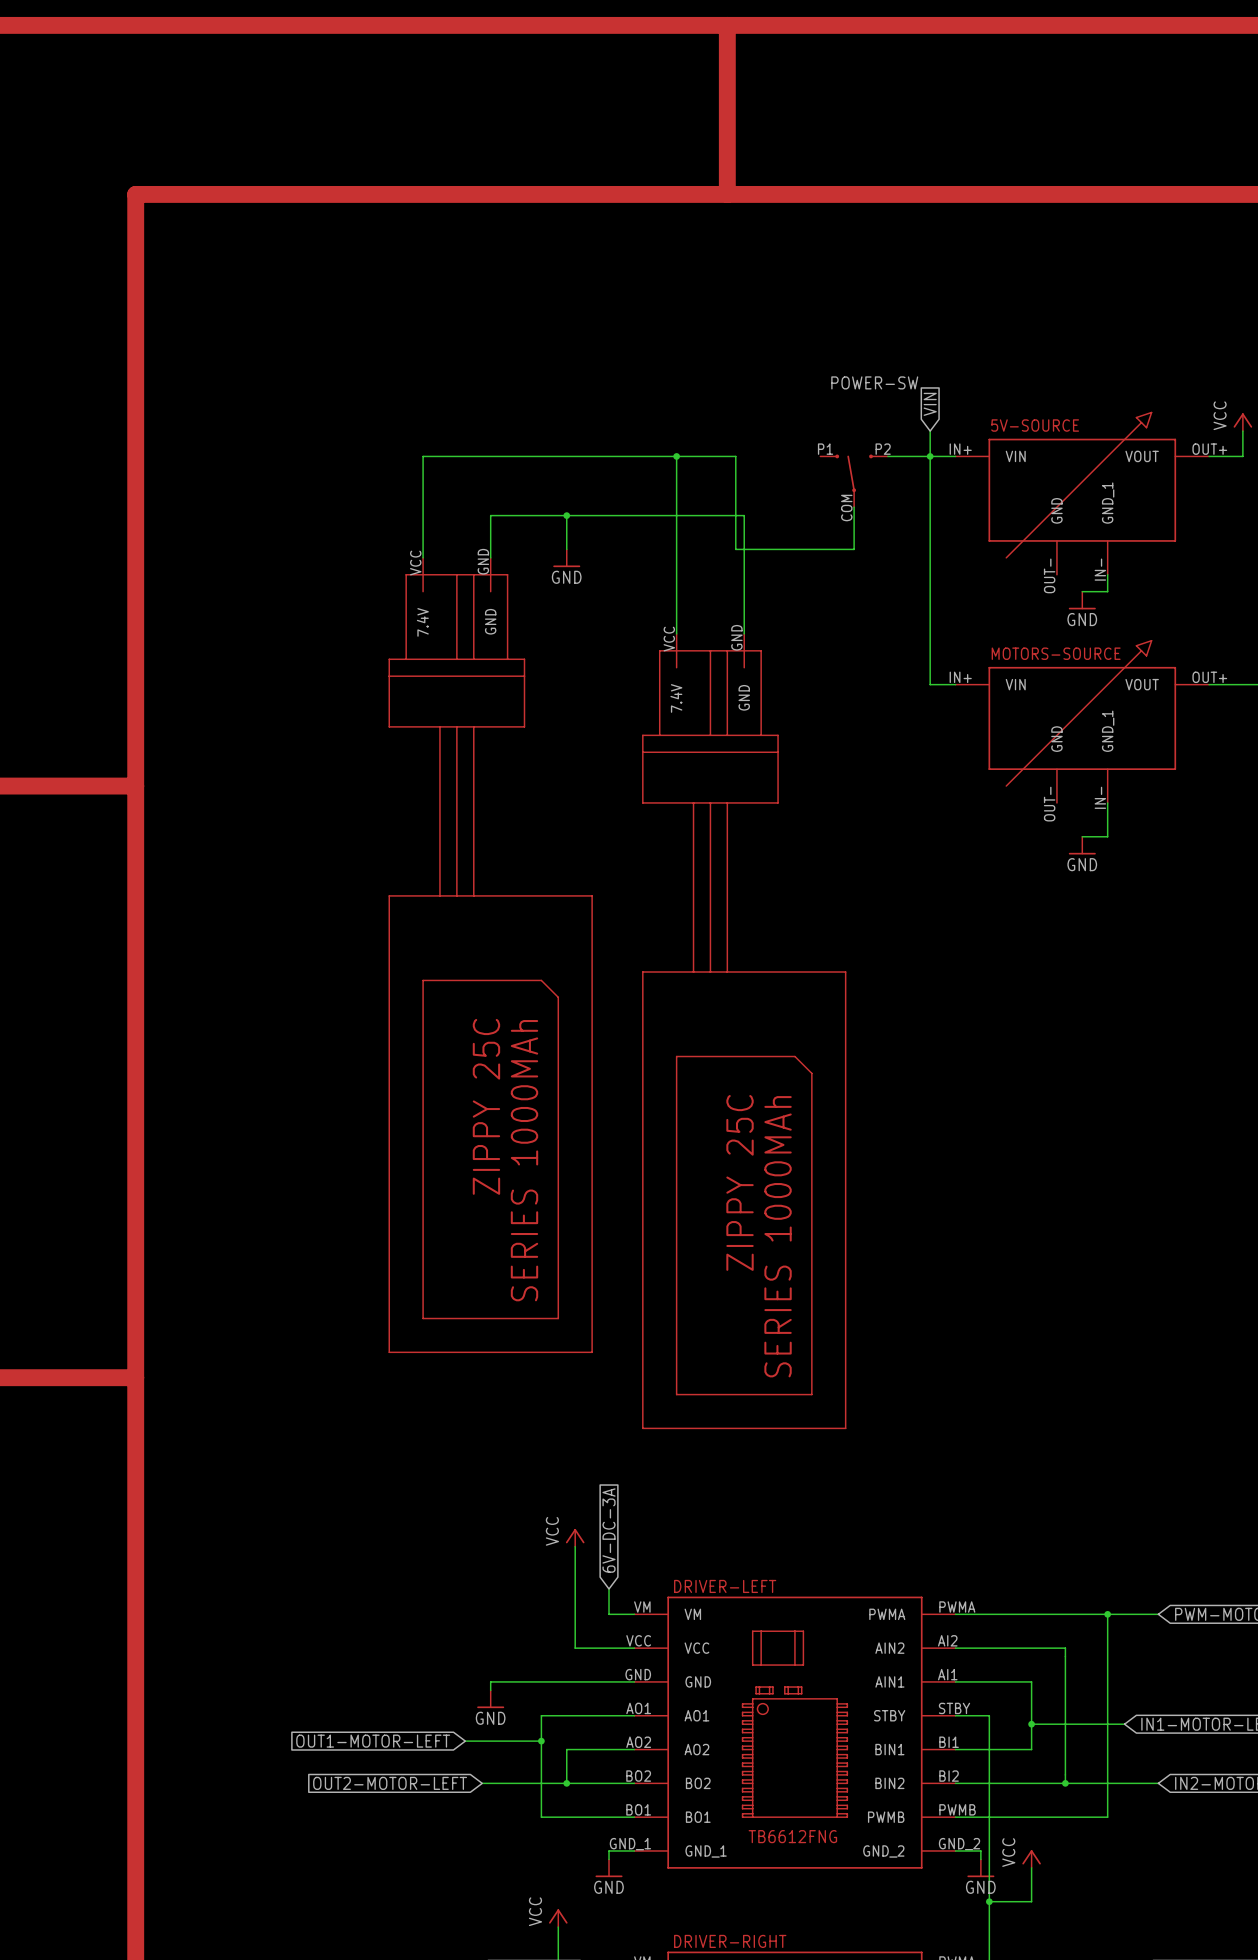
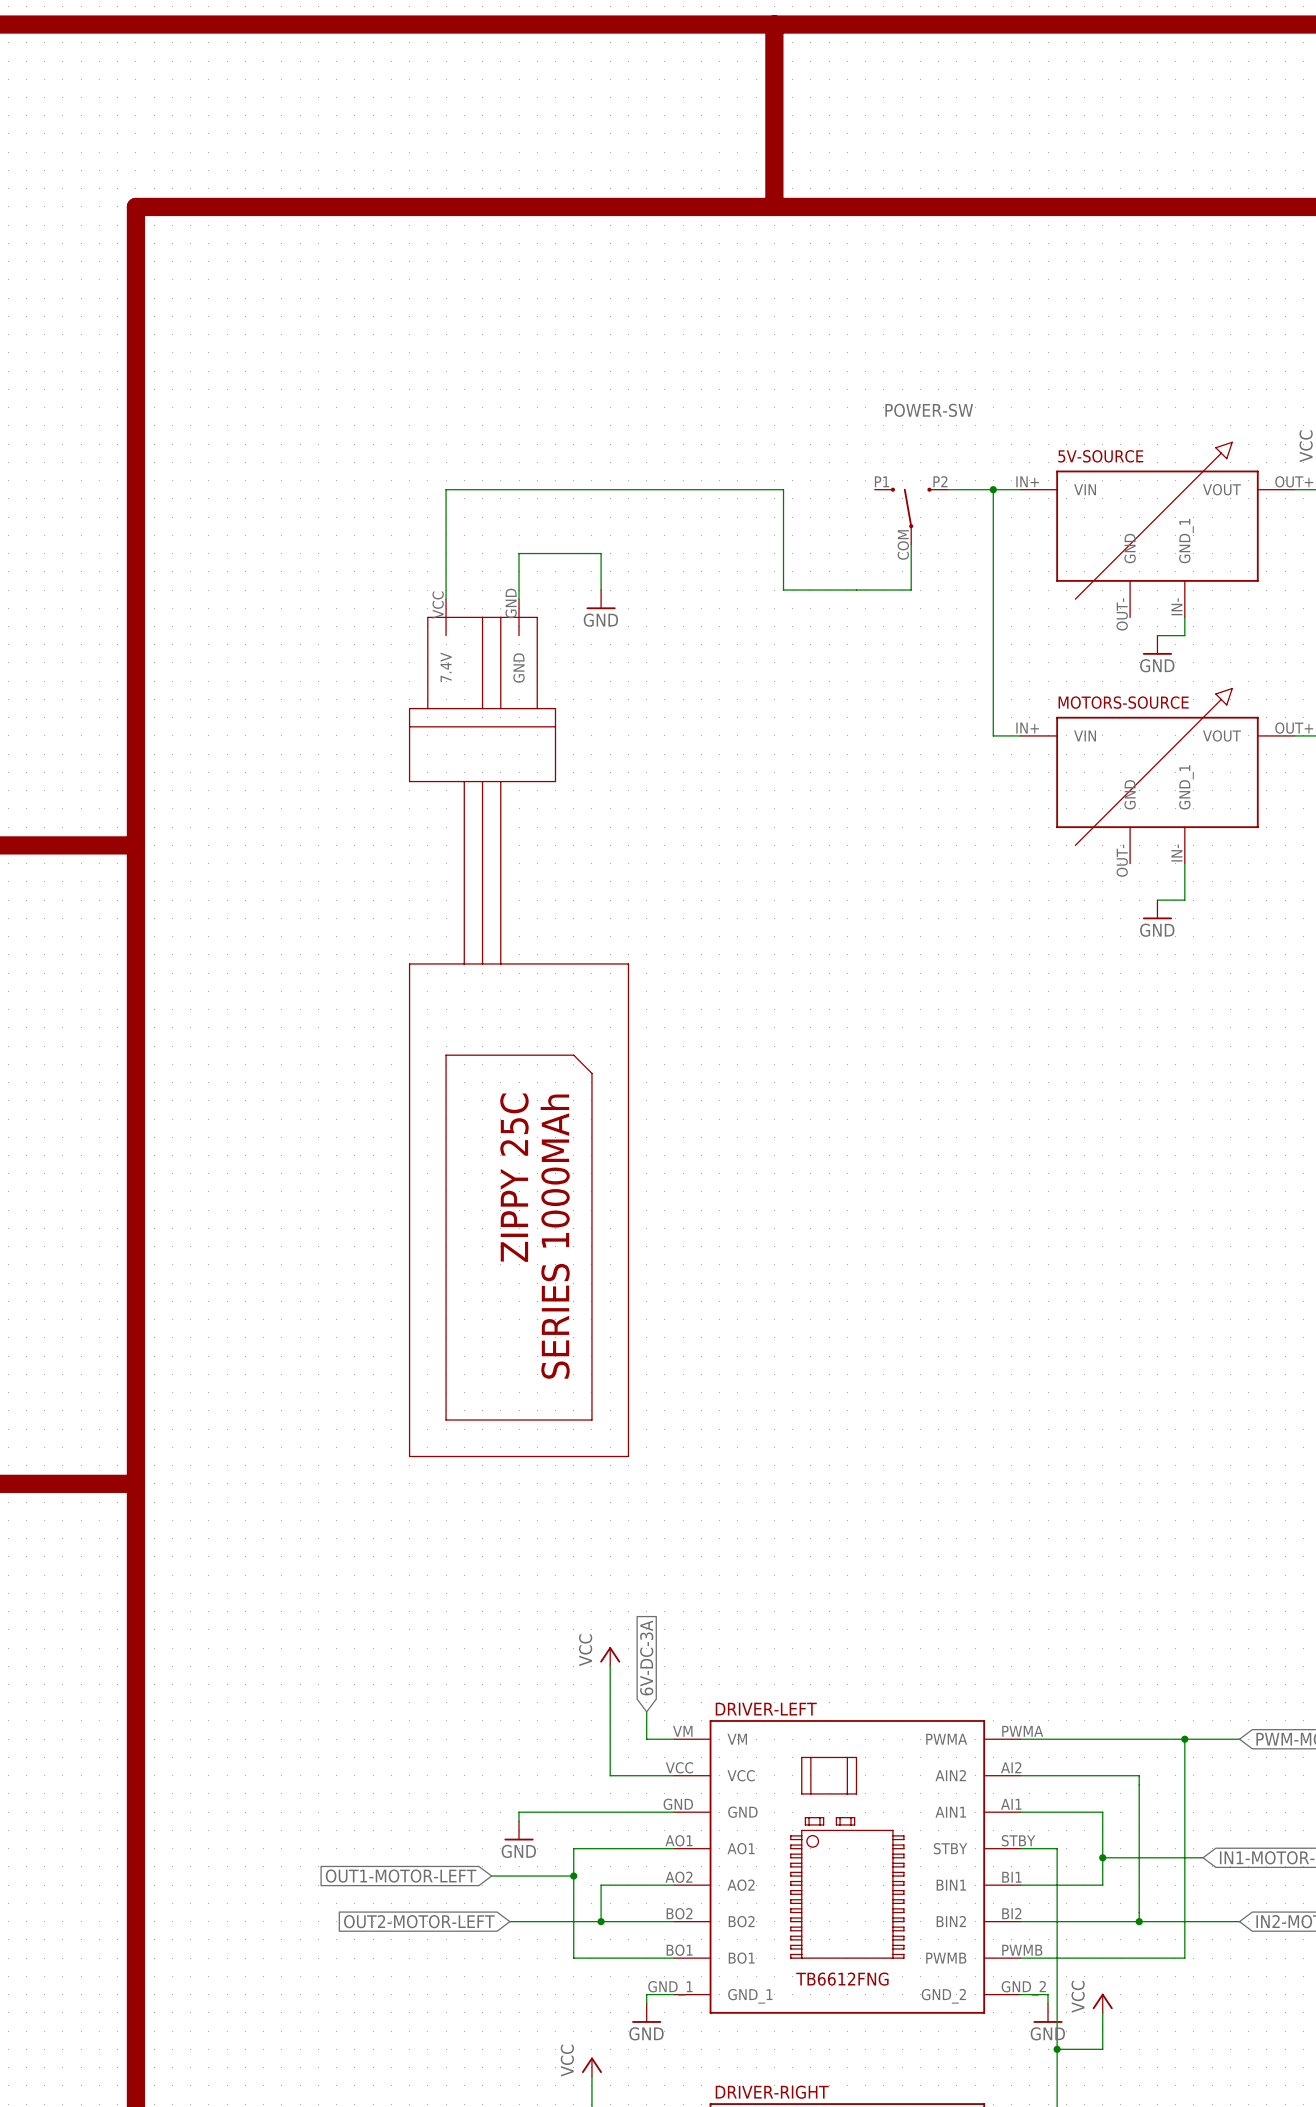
global label: VIN (930, 404) -> none
wire: (930, 431) (930, 456) -> none
wire: (676, 456) (676, 633) -> none
junction: (676, 456) -> none
wire: (566, 515) (744, 515) (744, 633) -> none
junction: (566, 515) -> none
part: (744, 1031) -> none

